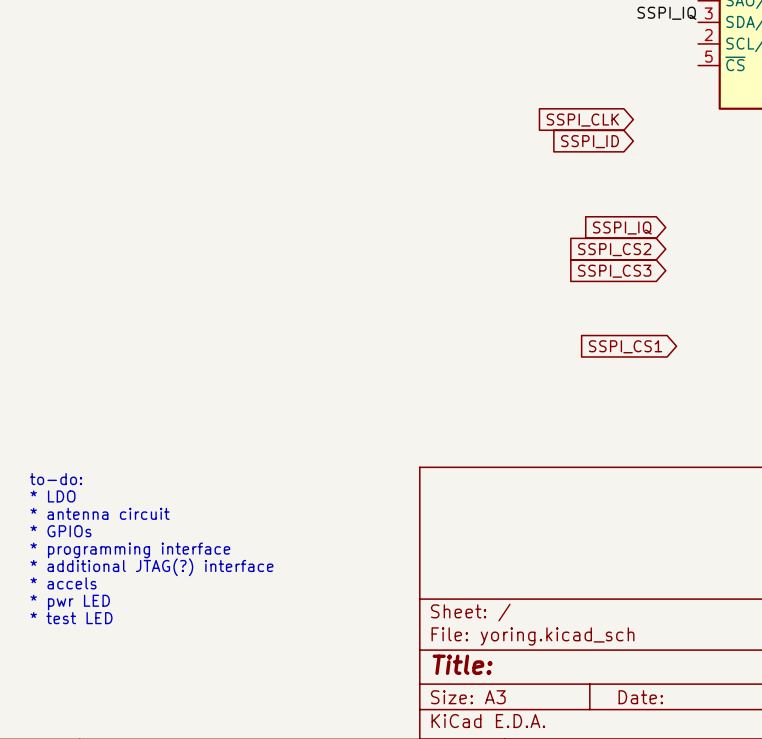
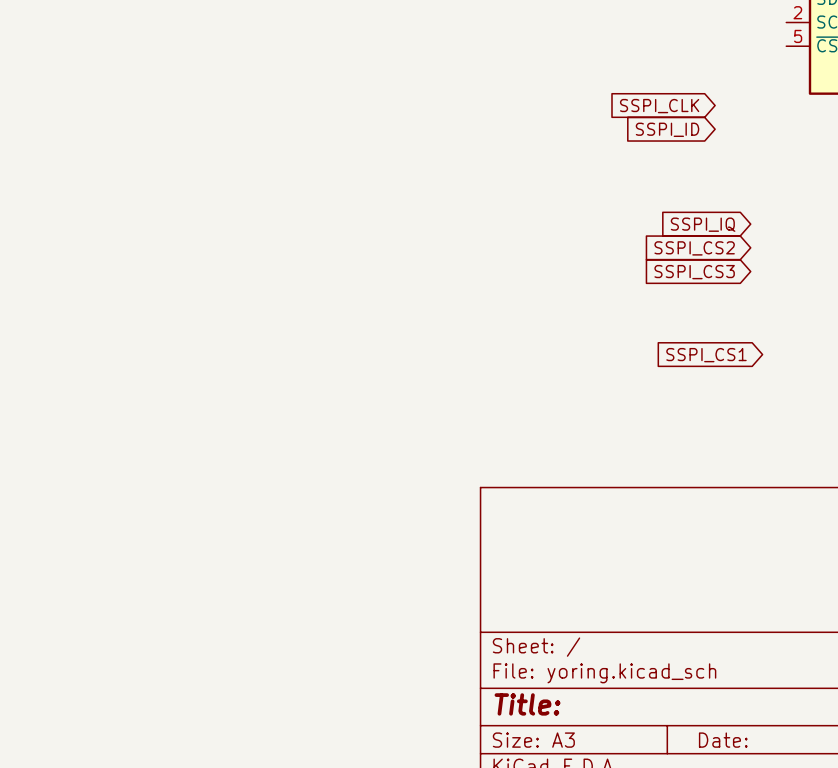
text: to-do: (56, 479) -> none
text: * LDO (52, 496) -> none
text: * antenna circuit (100, 513) -> none
text: * GPIOs (60, 531) -> none
text: * programming interface (130, 550) -> none
text: * additional JTAG(?) interface (151, 567) -> none
text: * accels (63, 583) -> none
text: * pwr LED (70, 602) -> none
text: * test LED (71, 618) -> none

